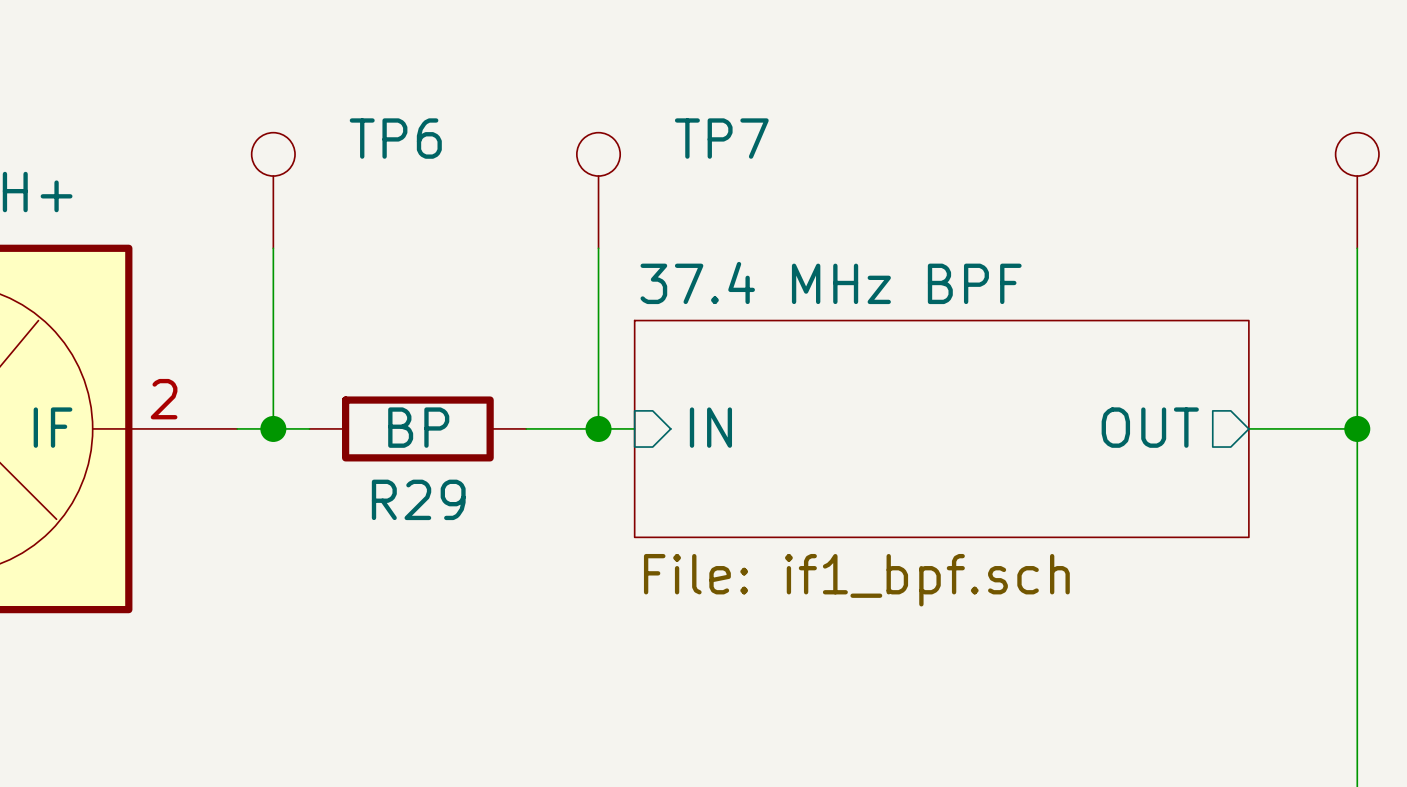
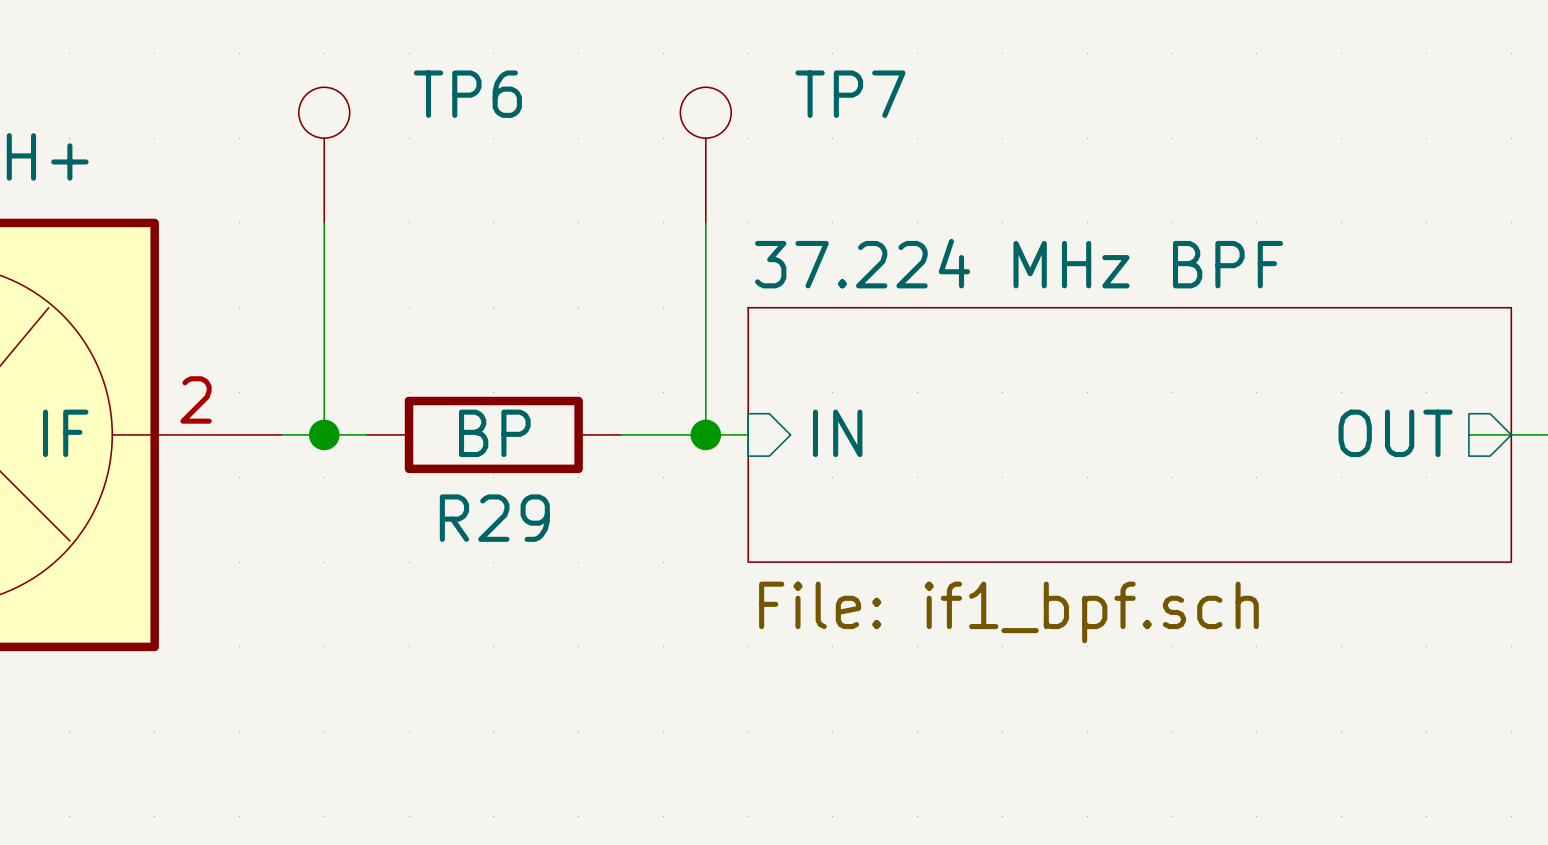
sheet pin position: OUT (1150, 427) -> OUT (1395, 433)
sheet 37.4 MHz BPF: File: if1_bpf.sch (941, 428) -> none
sheet 37.224 MHz BPF: none -> File: if1_bpf.sch (1129, 434)

